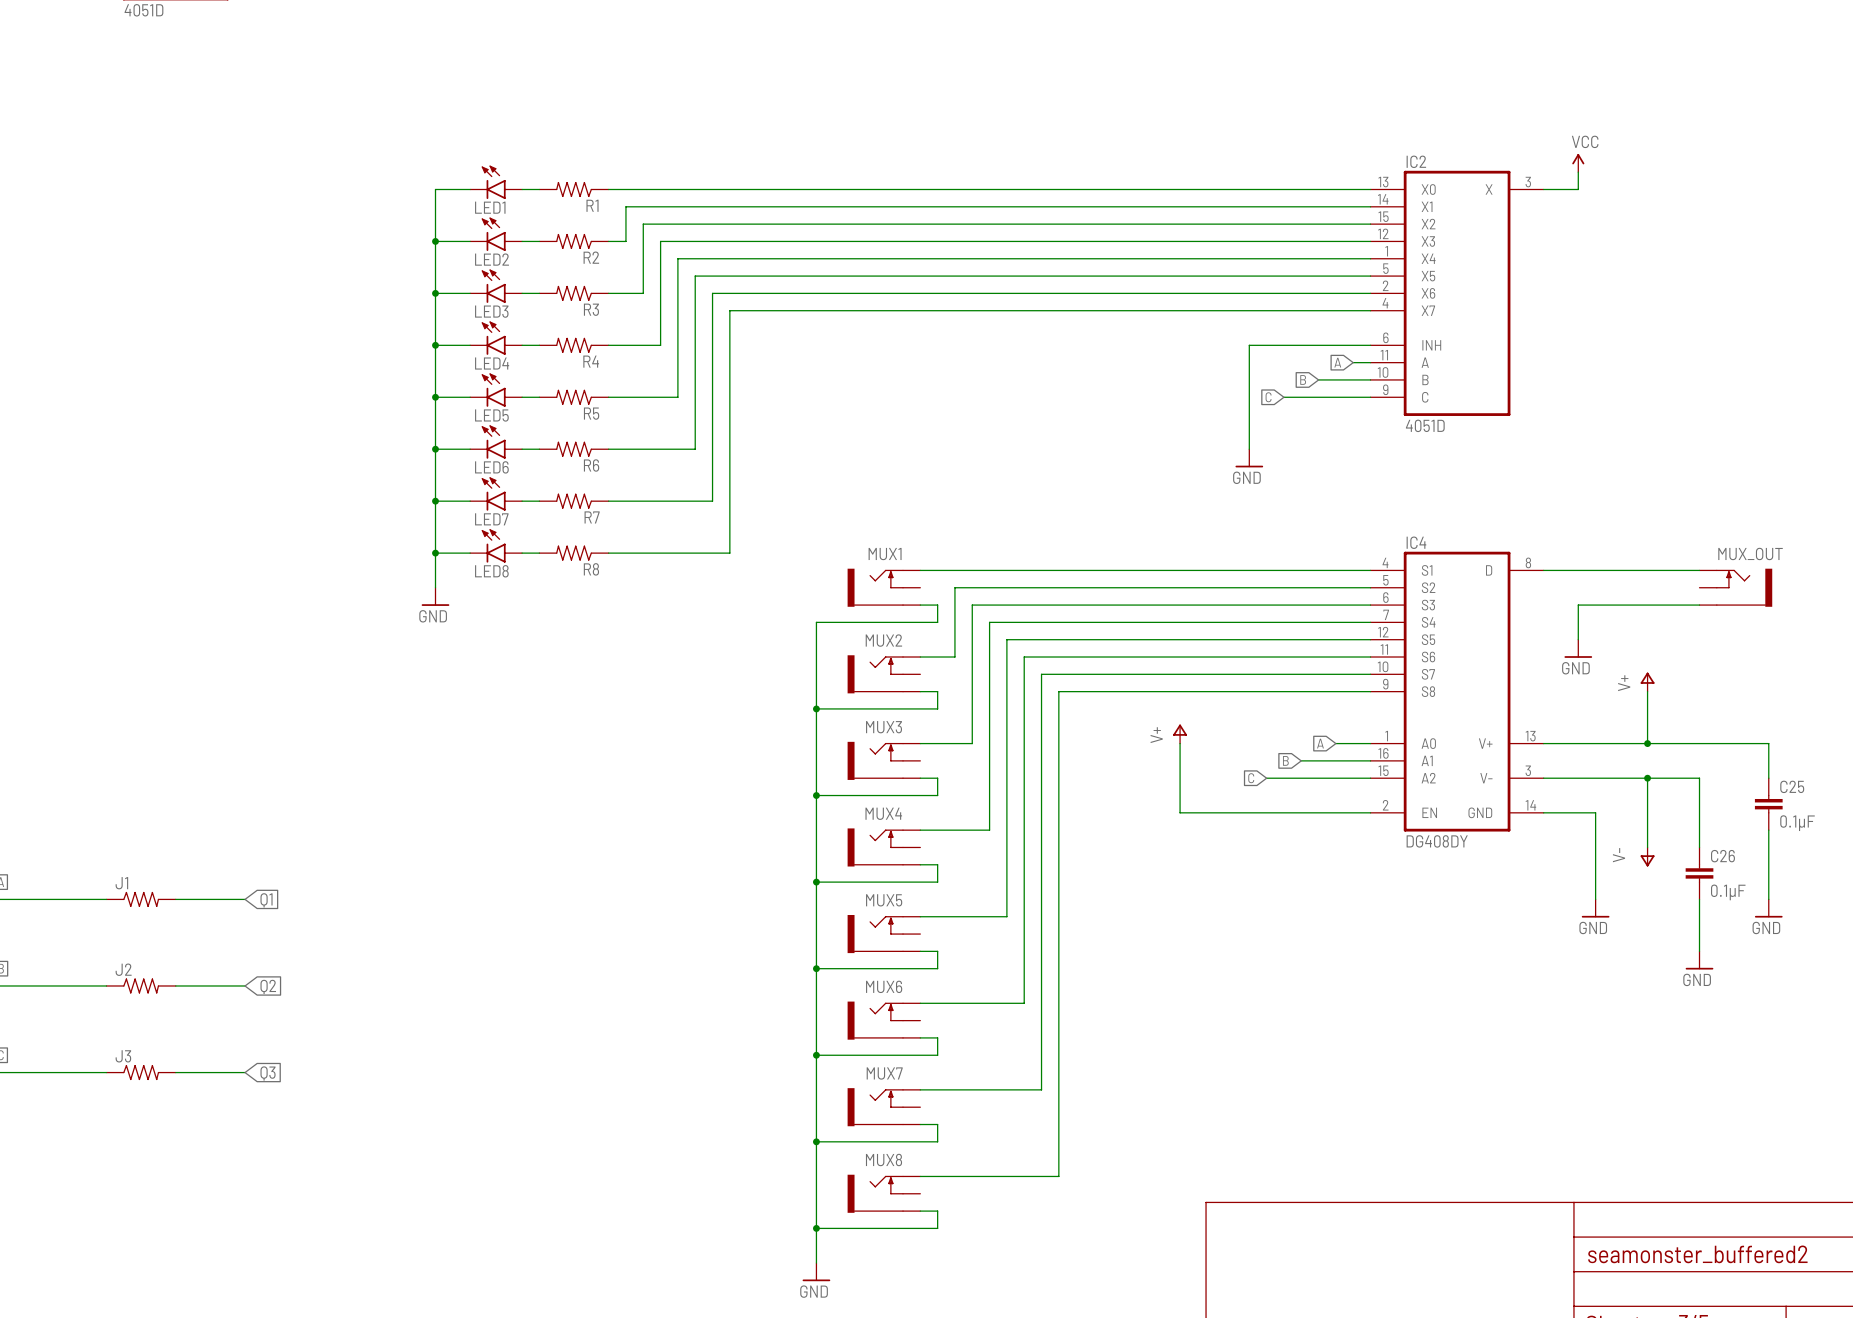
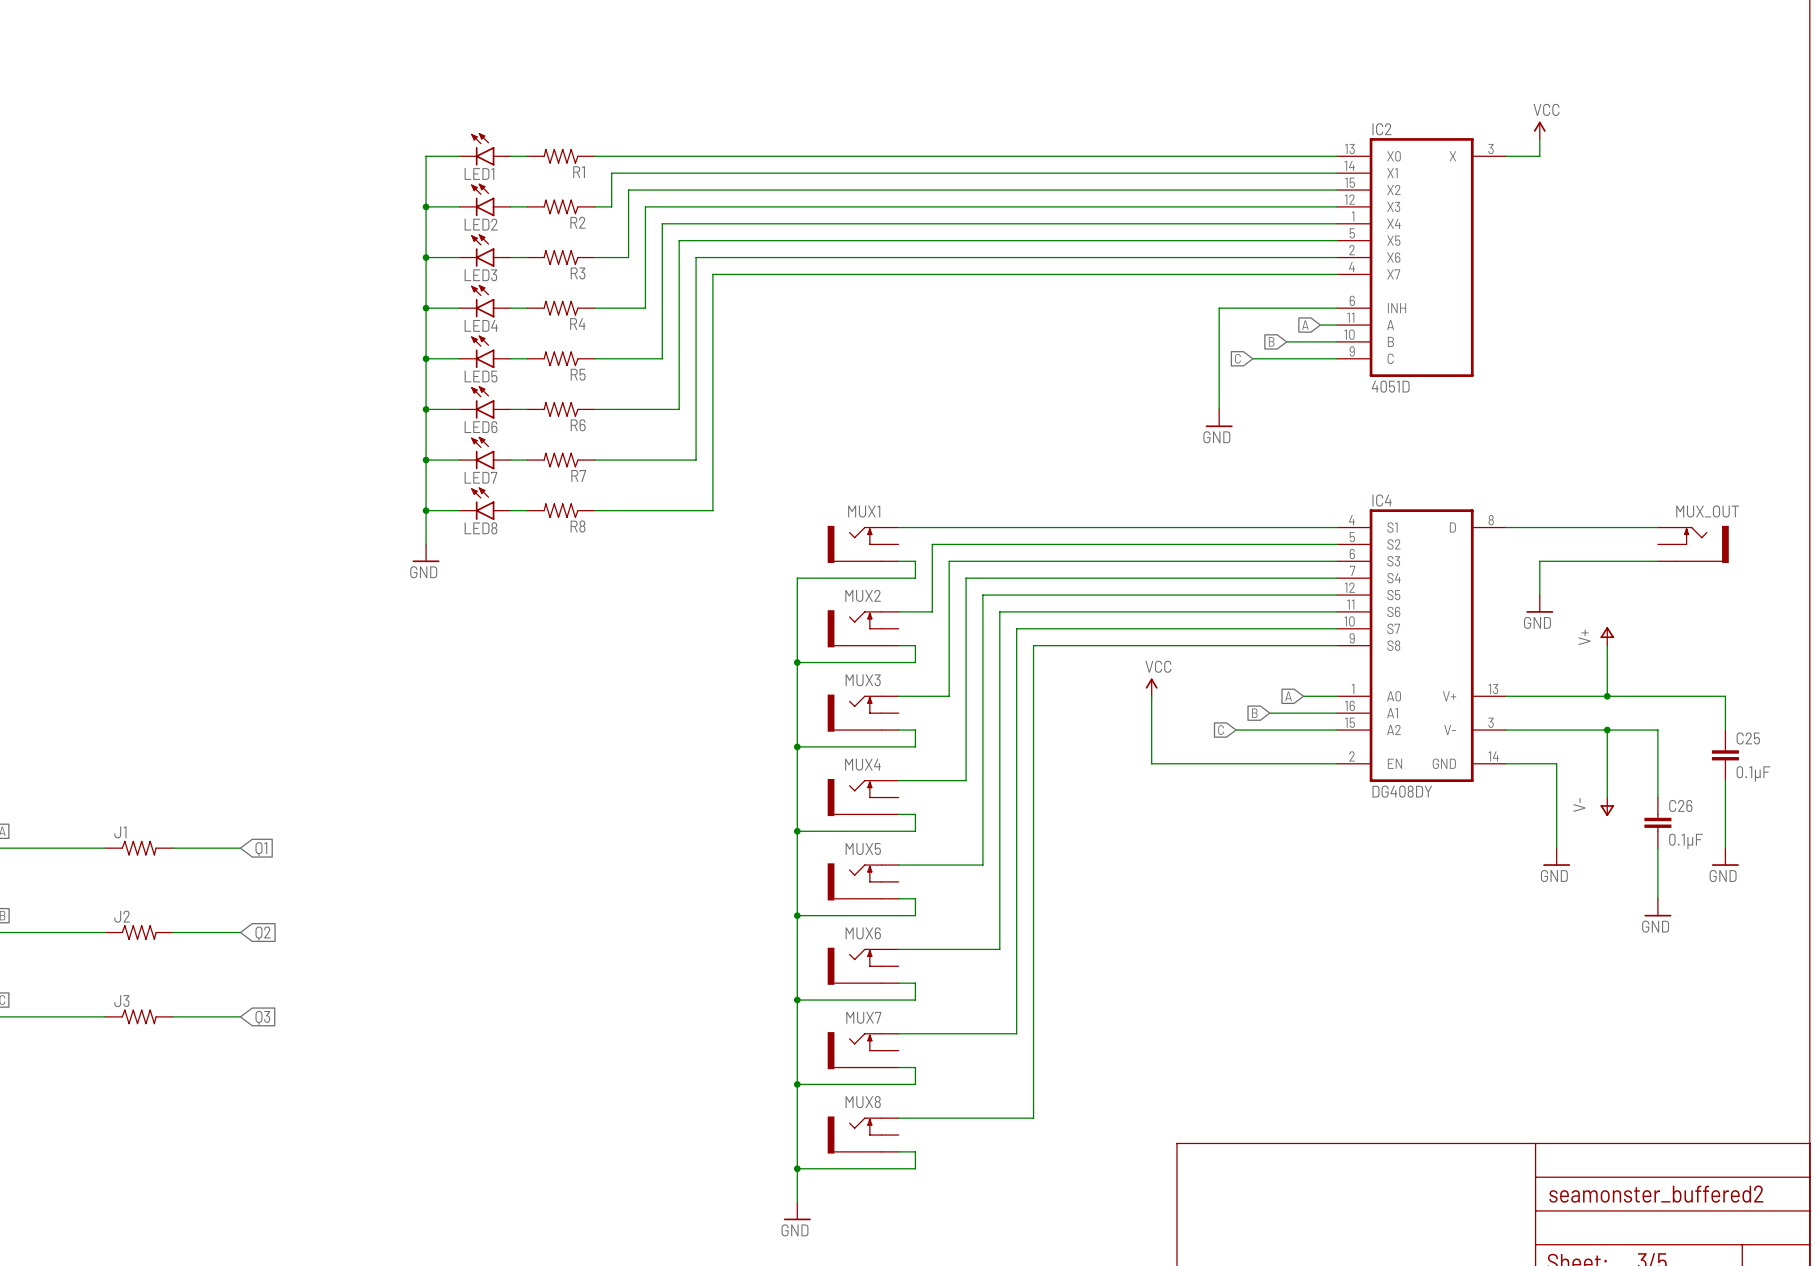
power symbol: V+ (1180, 734) -> VCC (1151, 687)

